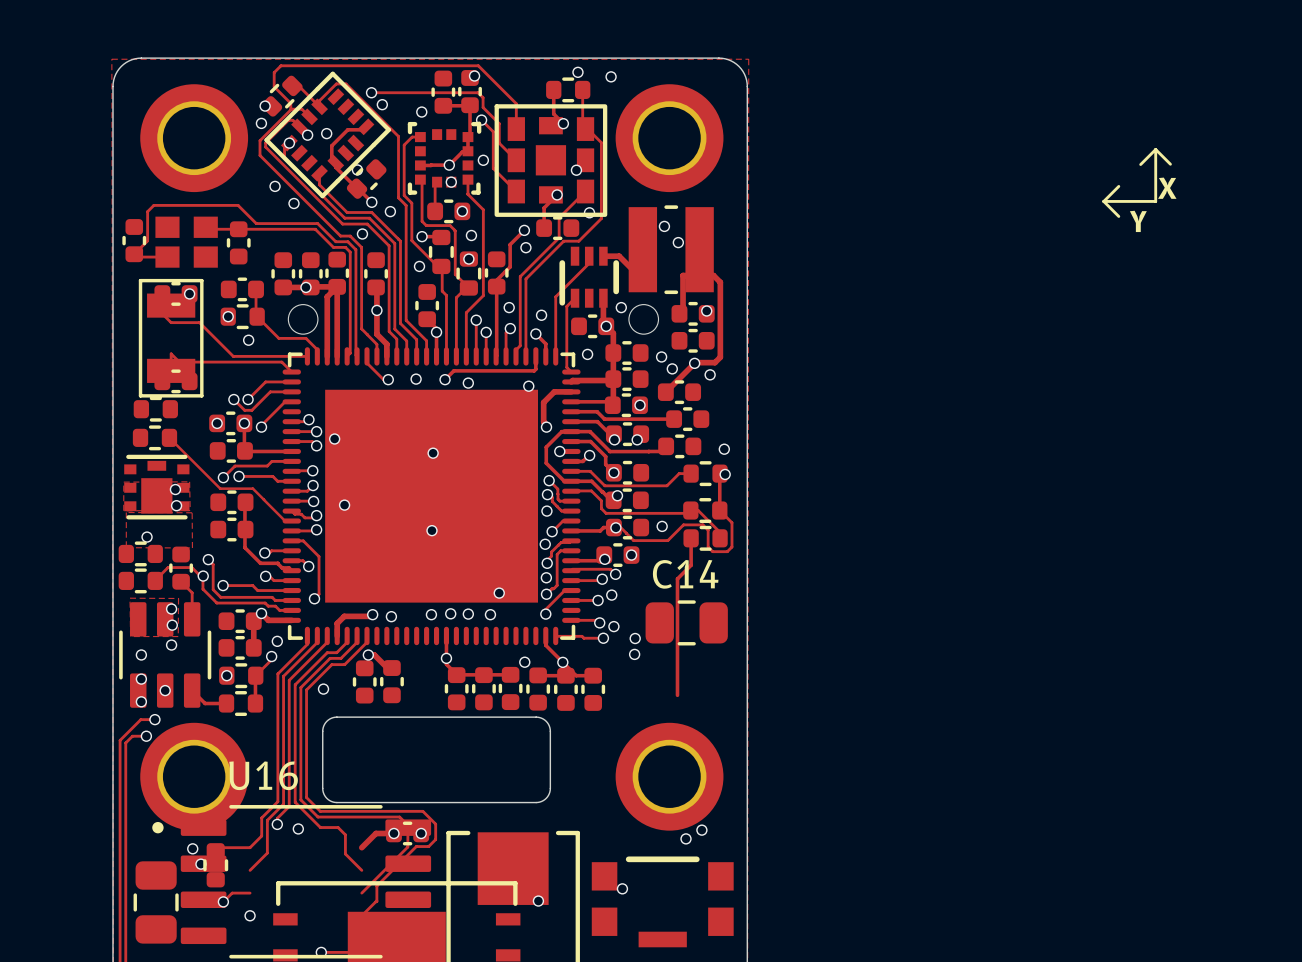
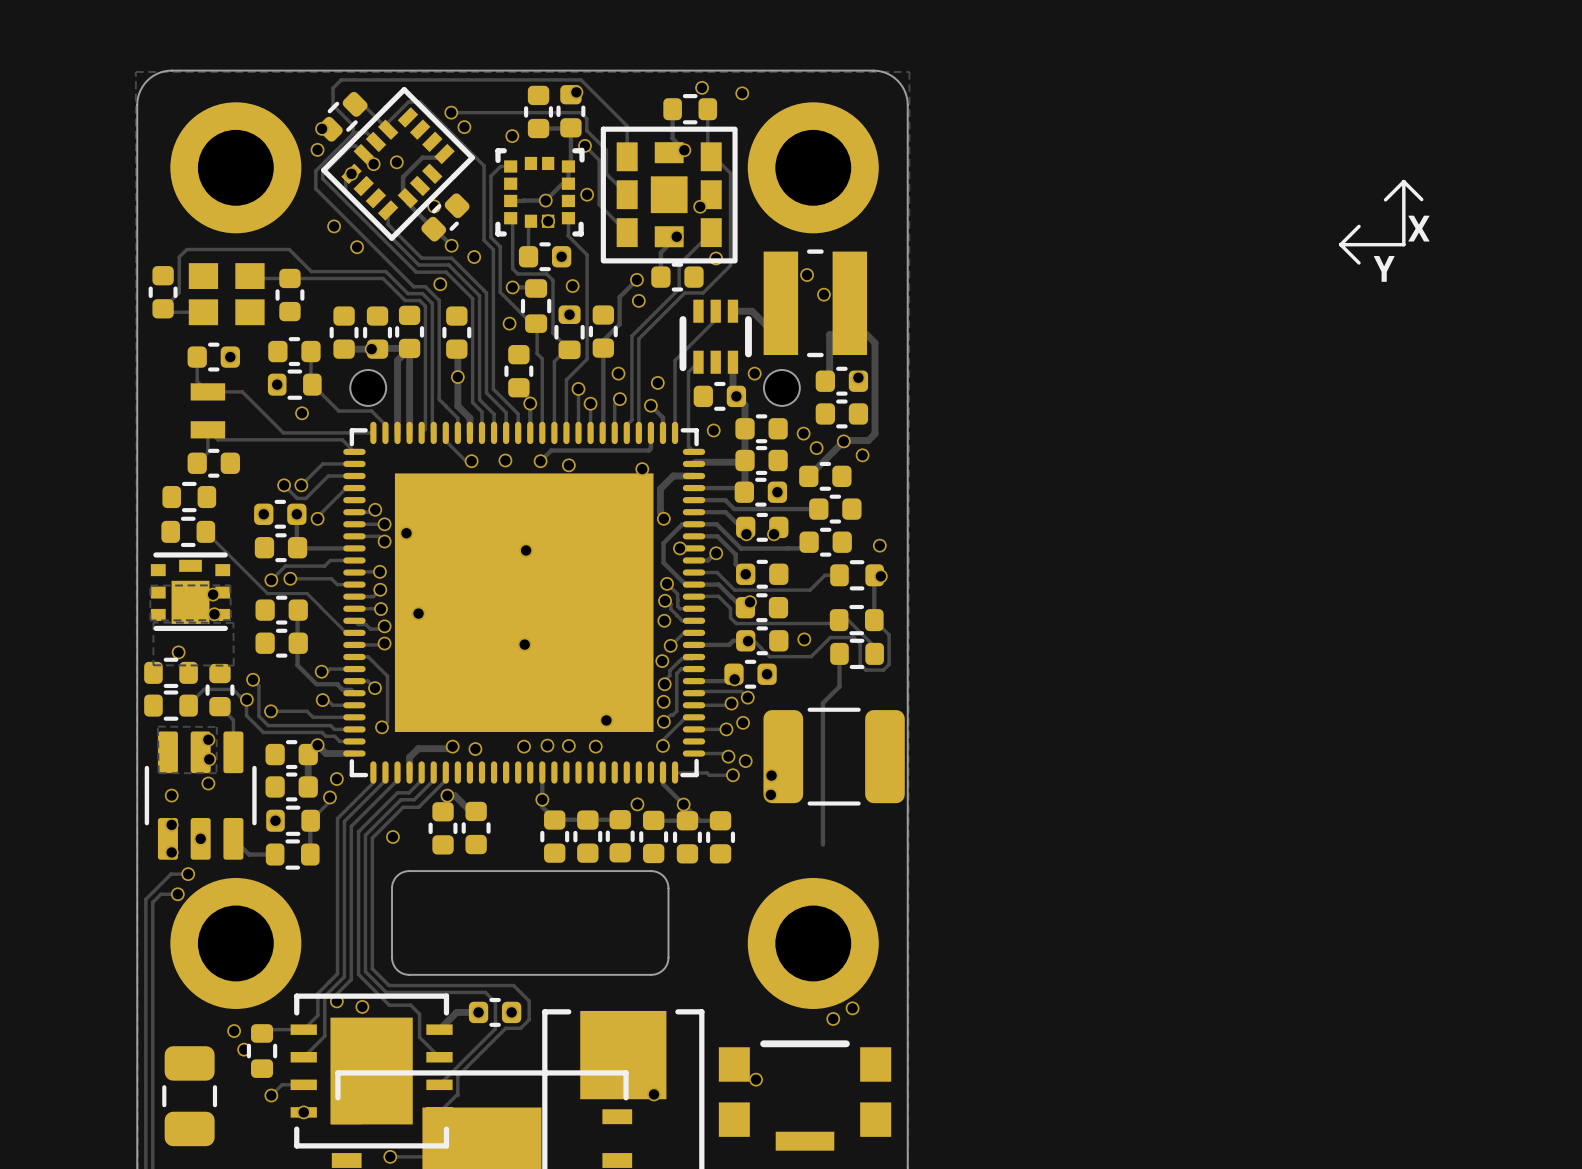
part footprint: [138, 278, 204, 398] -> [190, 383, 226, 439]
C14: (686, 622) -> none
part: none -> (834, 756)
U16: (291, 881) -> none
part: none -> (371, 1071)

